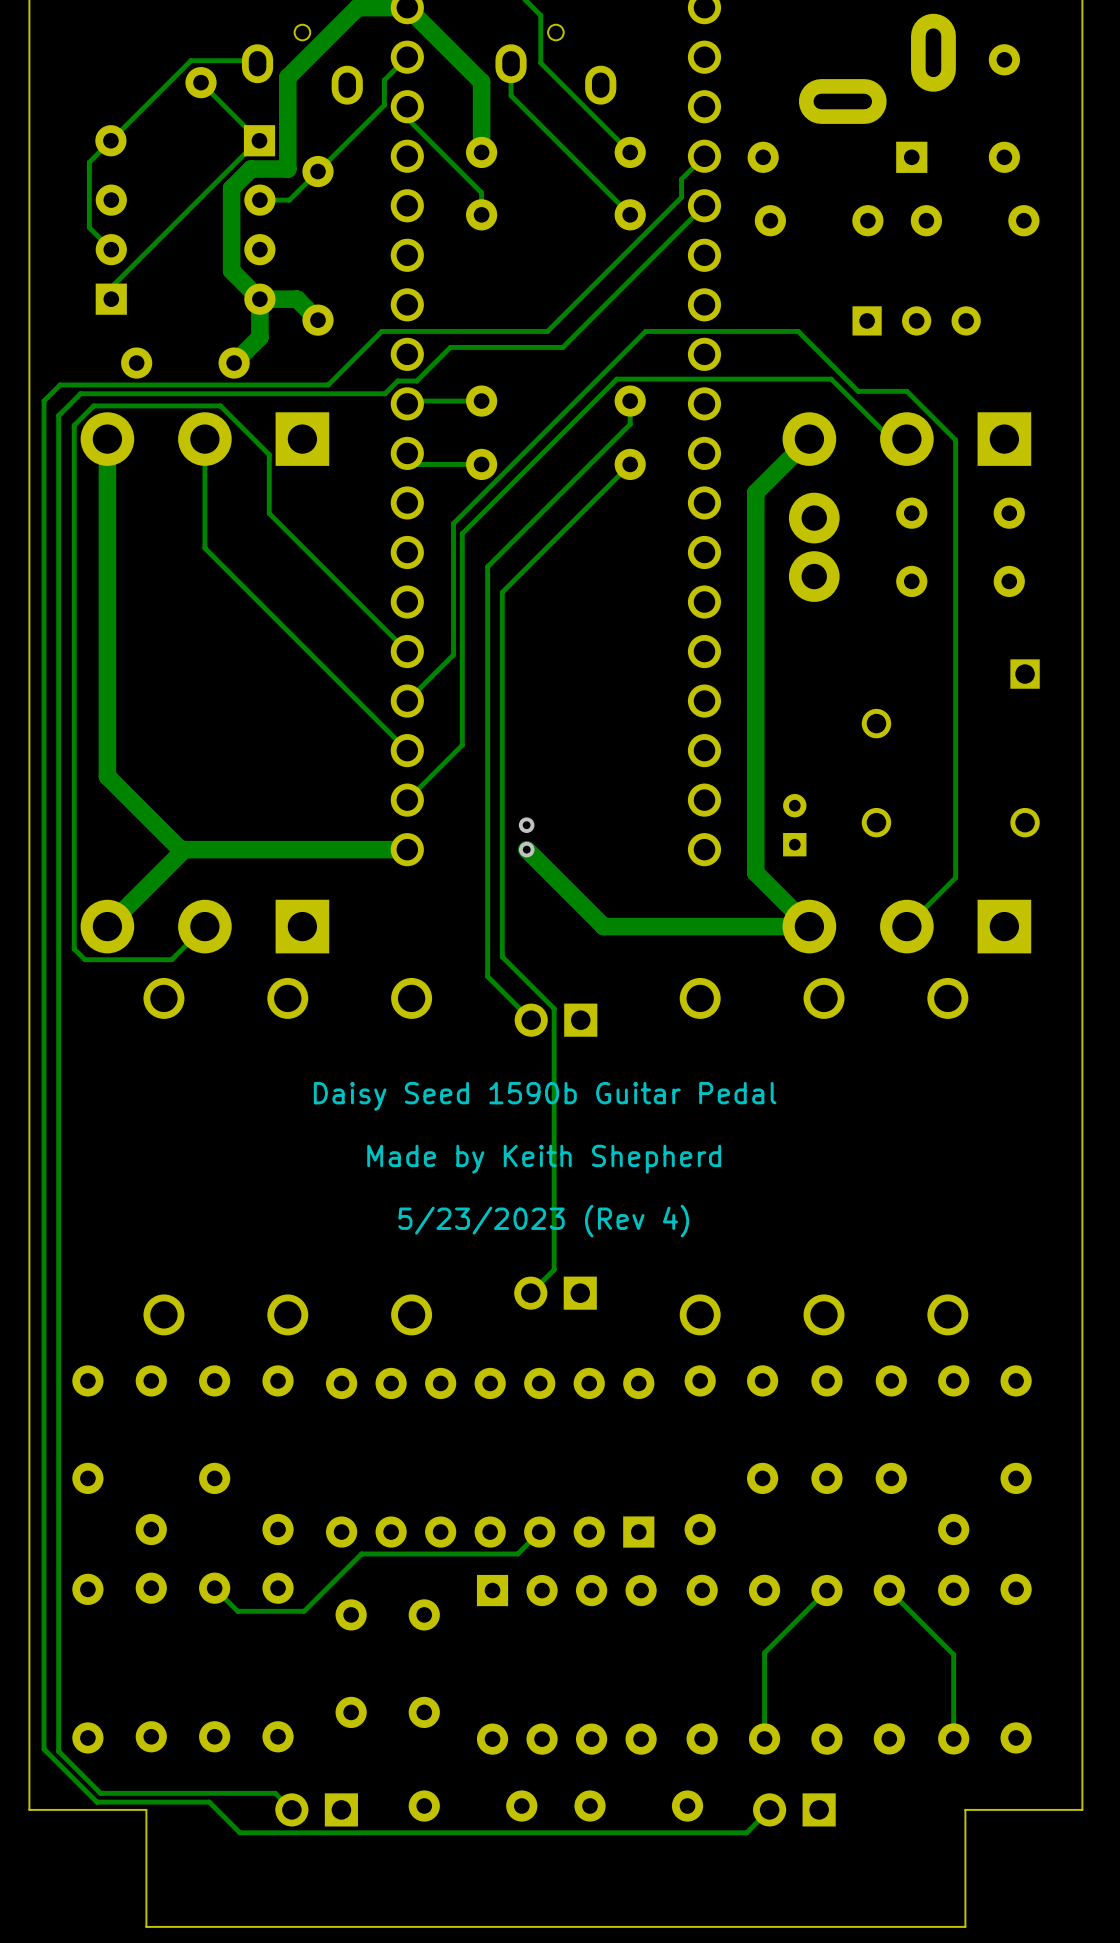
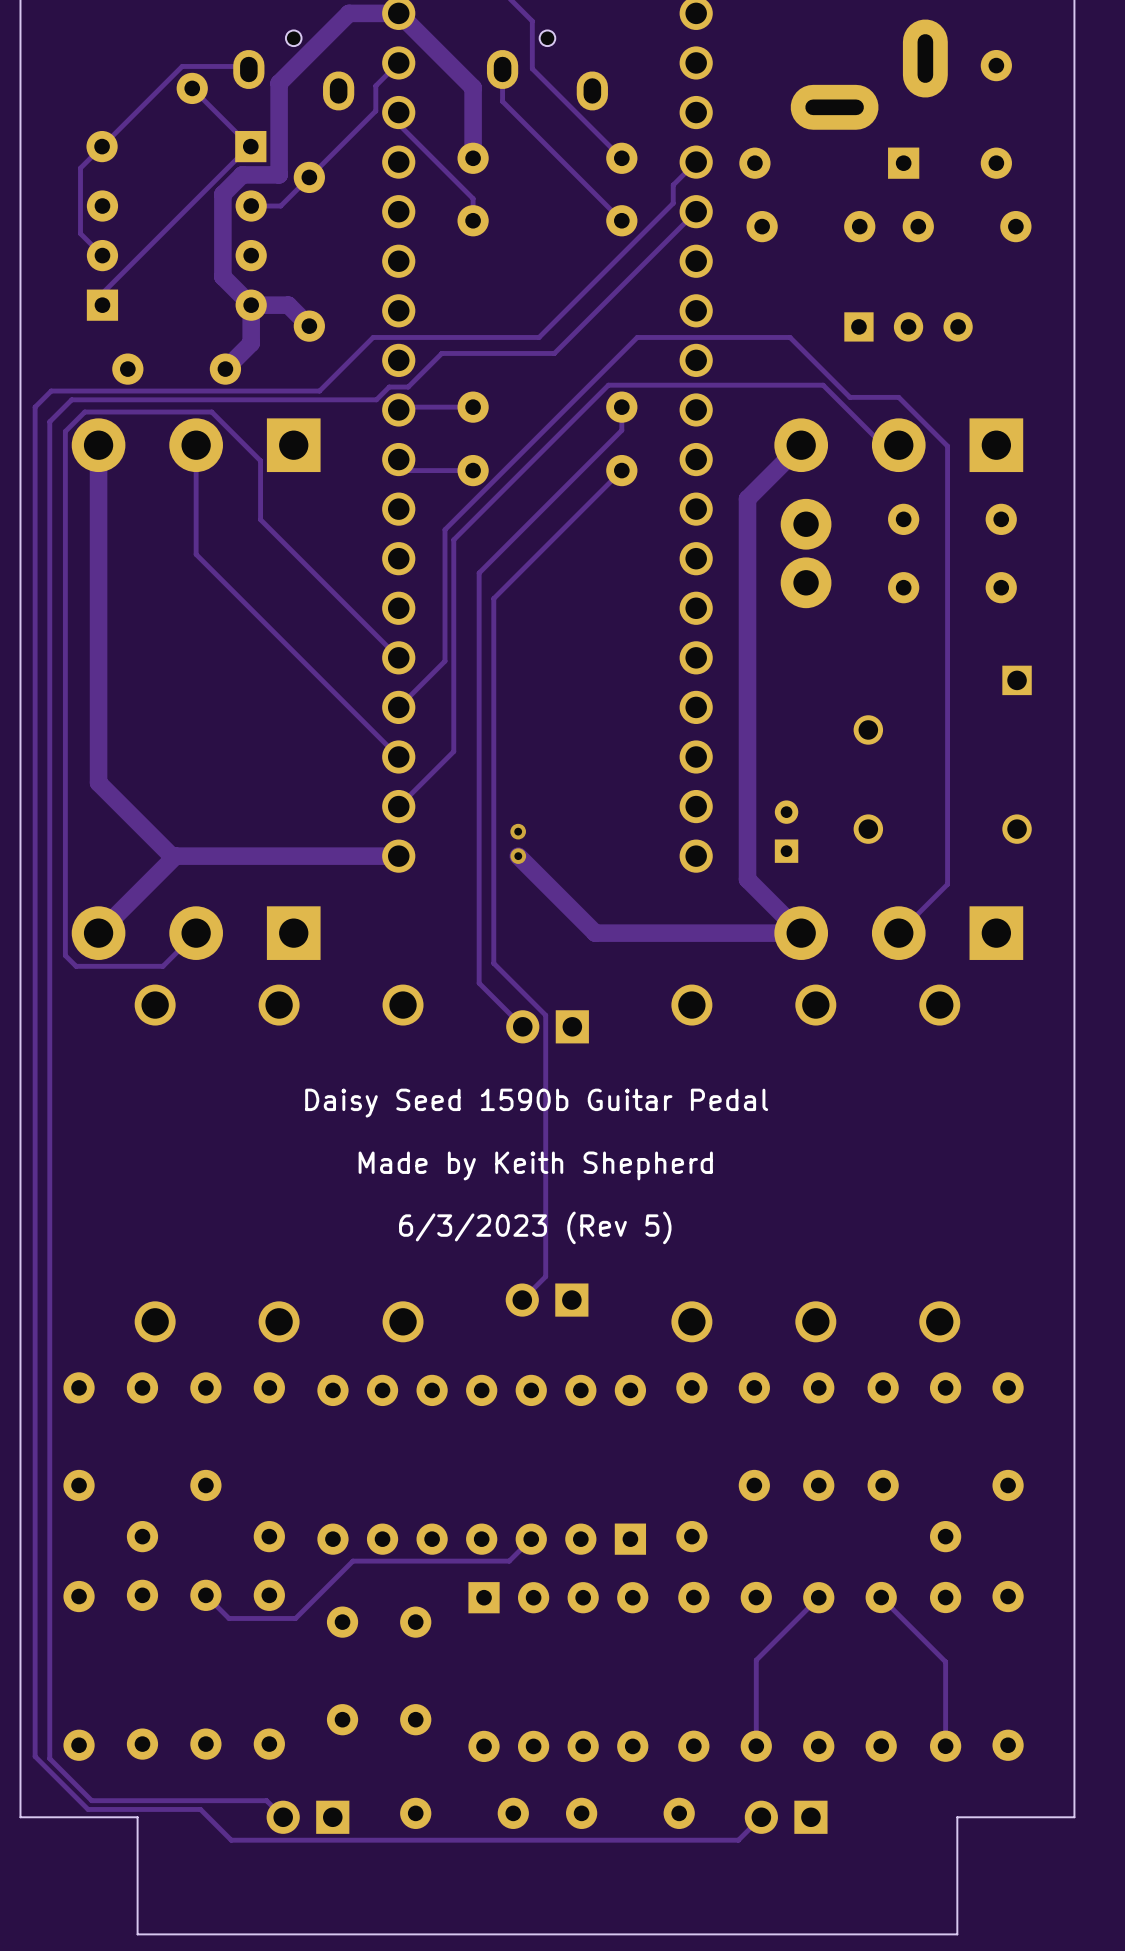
text: 5/23/2023 (Rev 4) (543, 1221) -> 6/3/2023 (Rev 5) (535, 1227)

